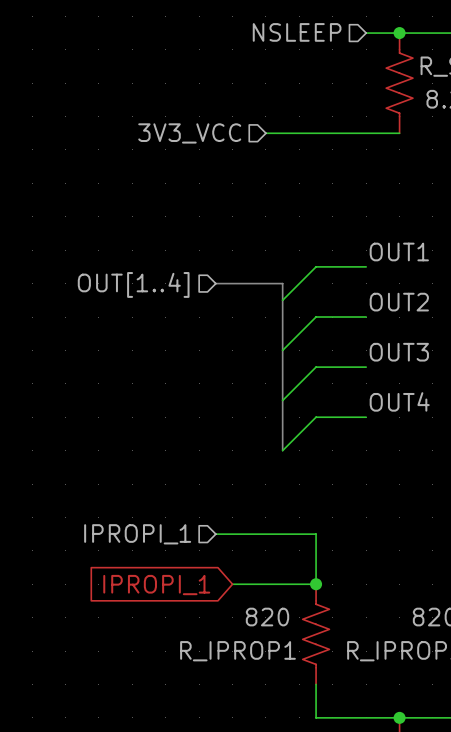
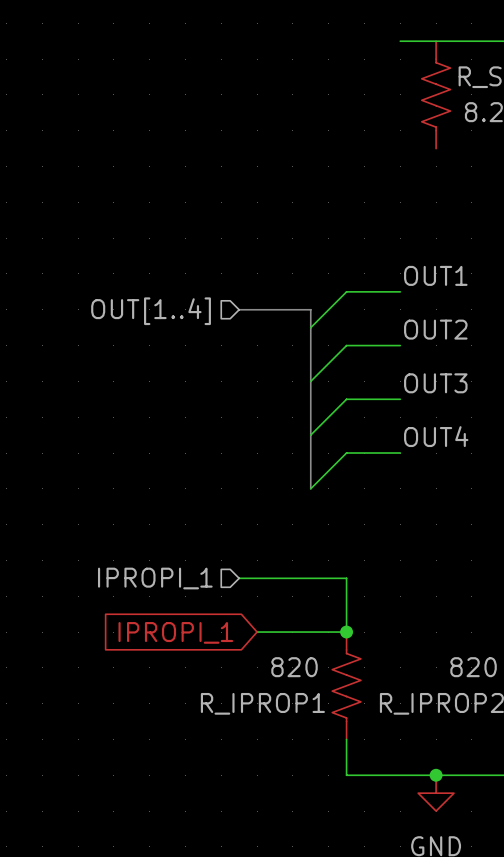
hierarchical label: NSLEEP (297, 32) -> none
junction: (399, 33) -> none
hierarchical label: 3V3_VCC (189, 133) -> none
wire: (265, 133) (399, 133) -> none

